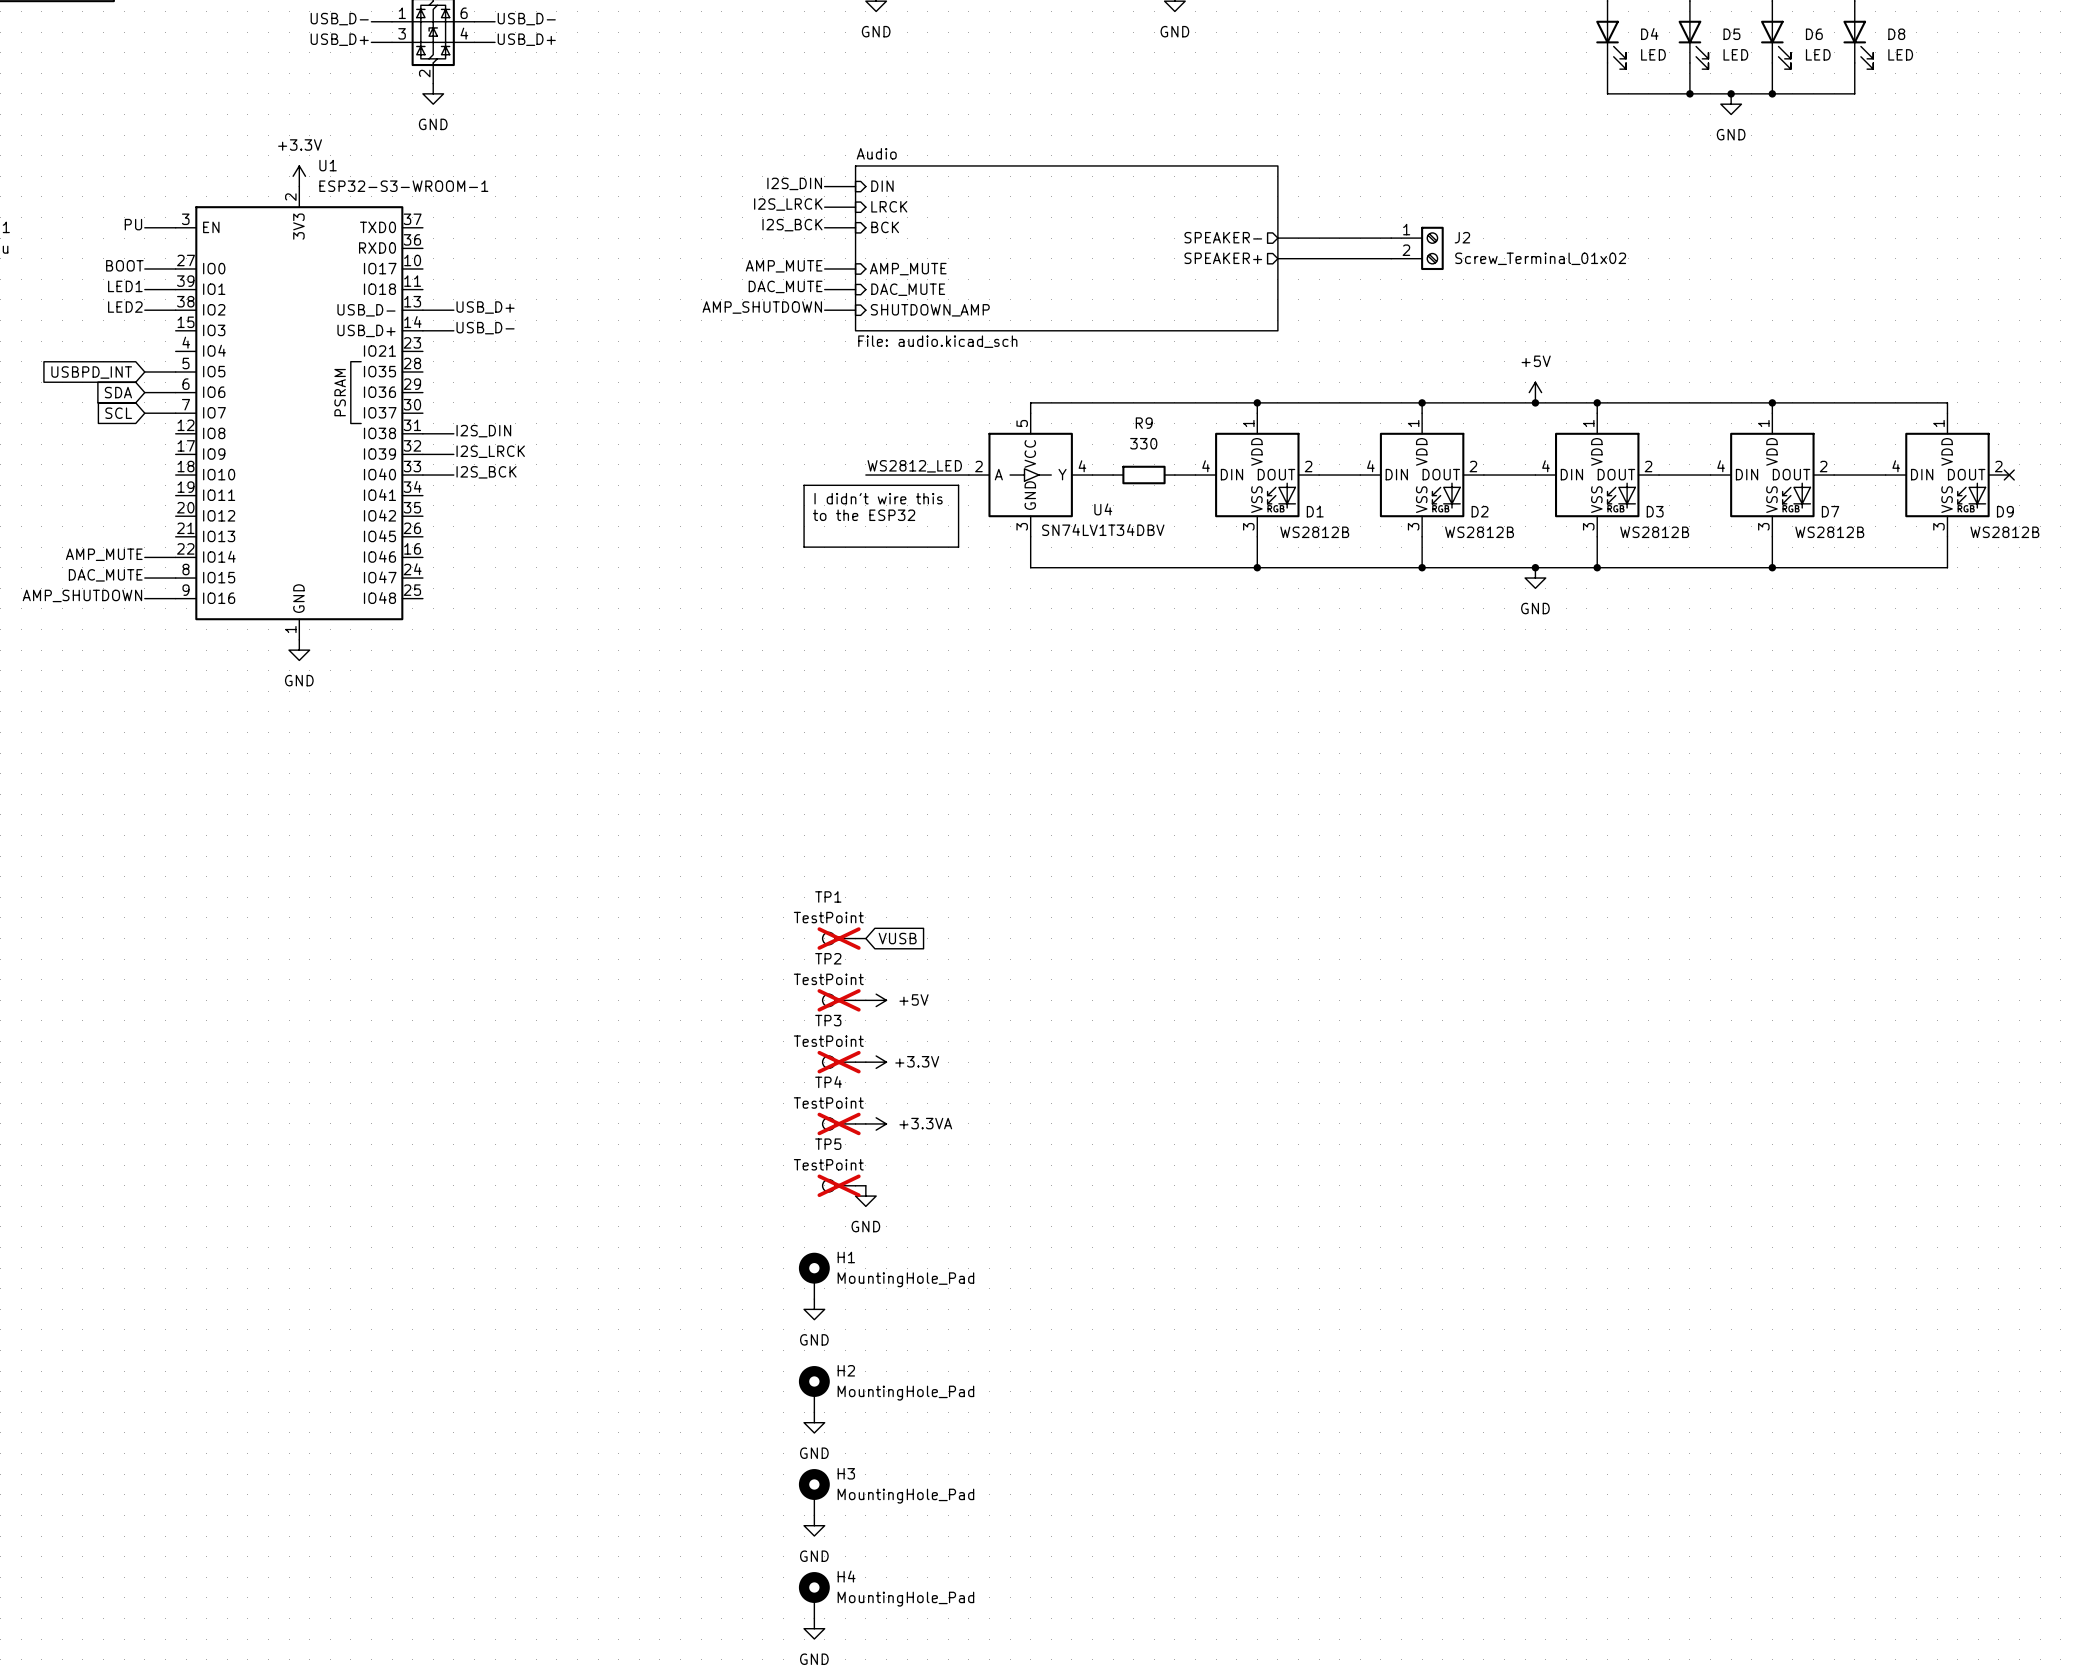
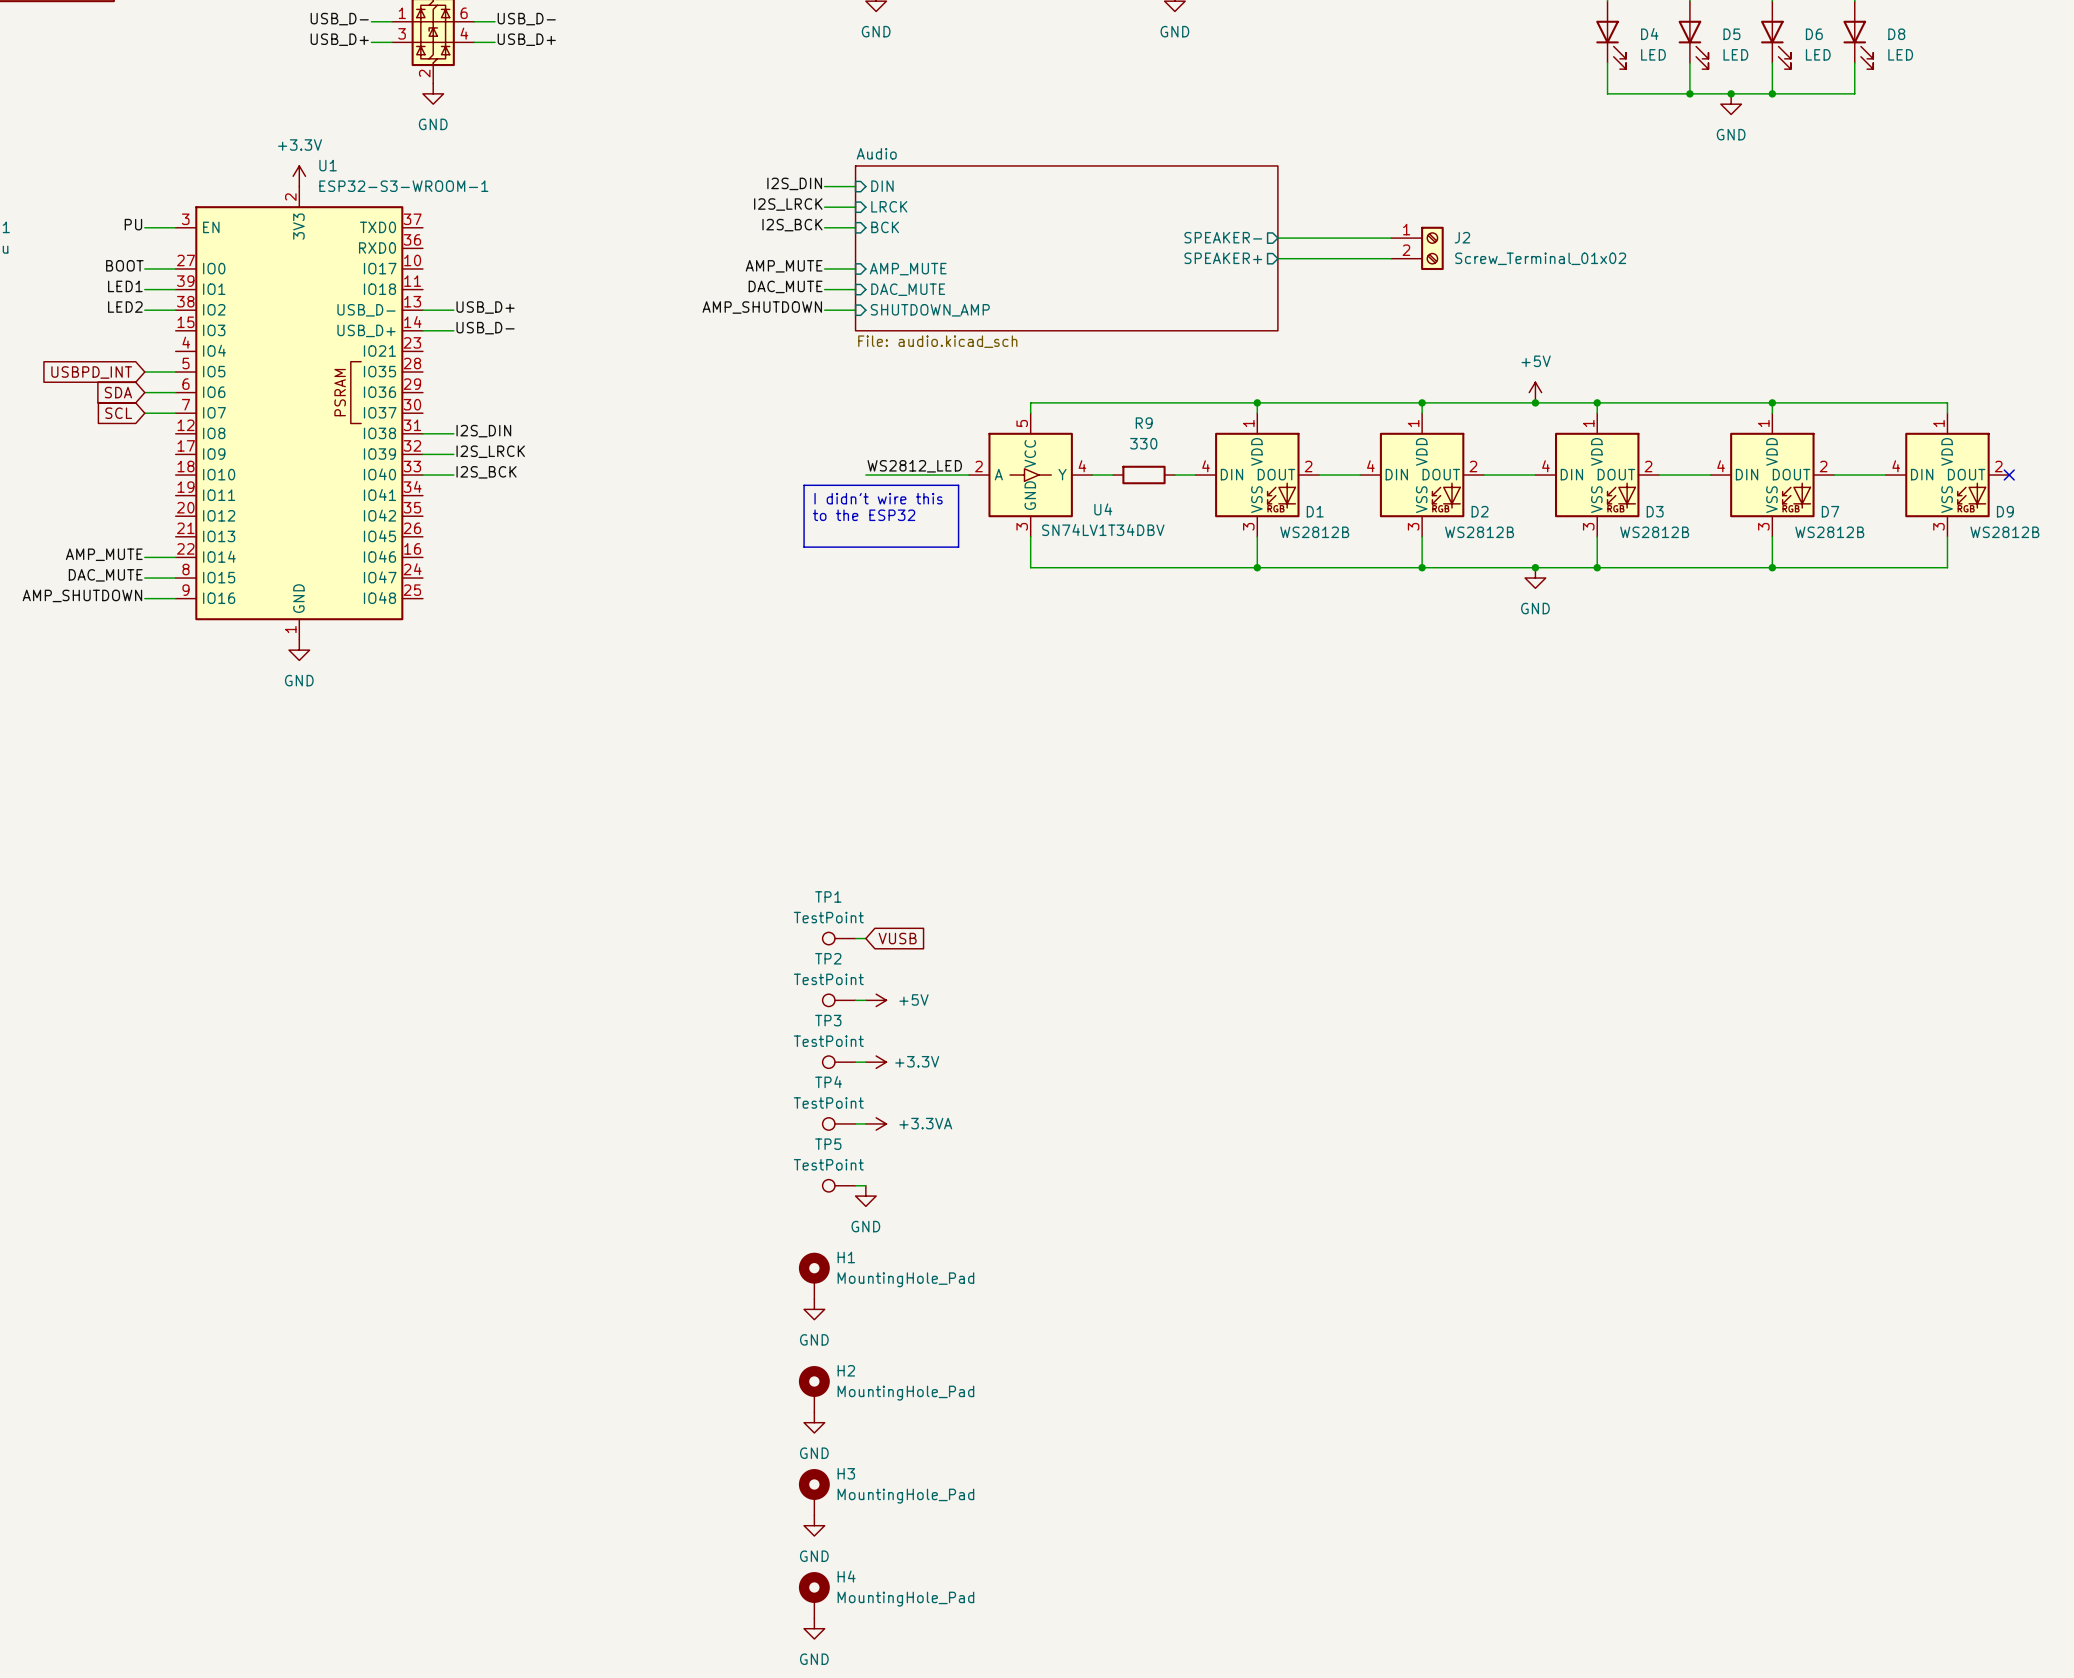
TP1 do-not-place cross: (839, 938) -> none
TP2 do-not-place cross: (839, 1000) -> none
TP3 do-not-place cross: (839, 1062) -> none
TP4 do-not-place cross: (839, 1123) -> none
TP5 do-not-place cross: (839, 1185) -> none

